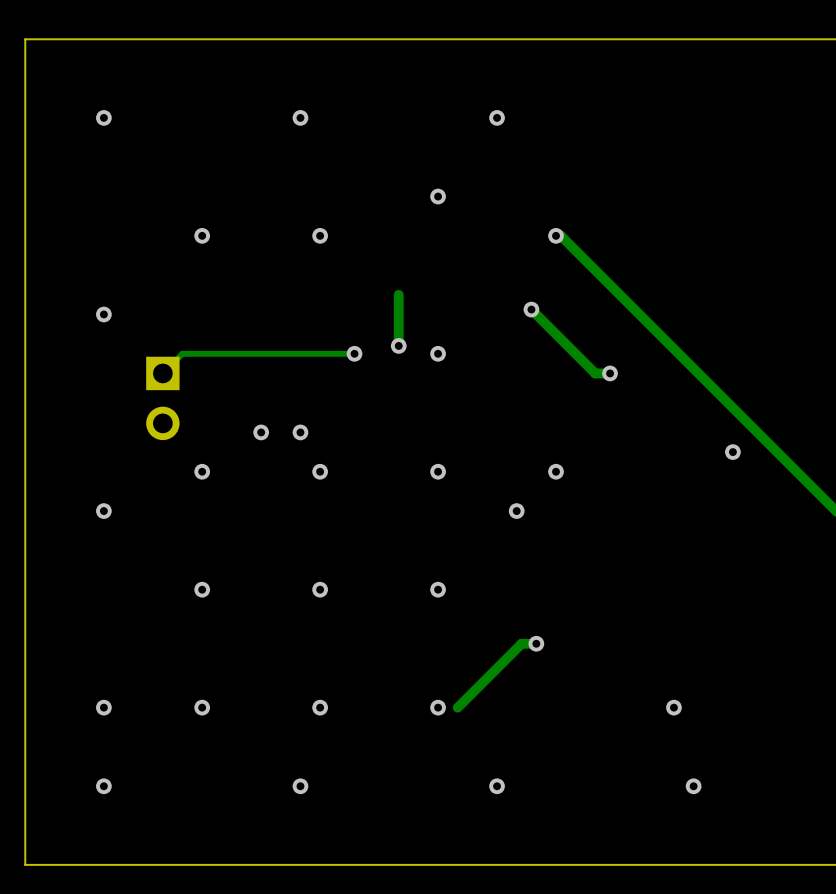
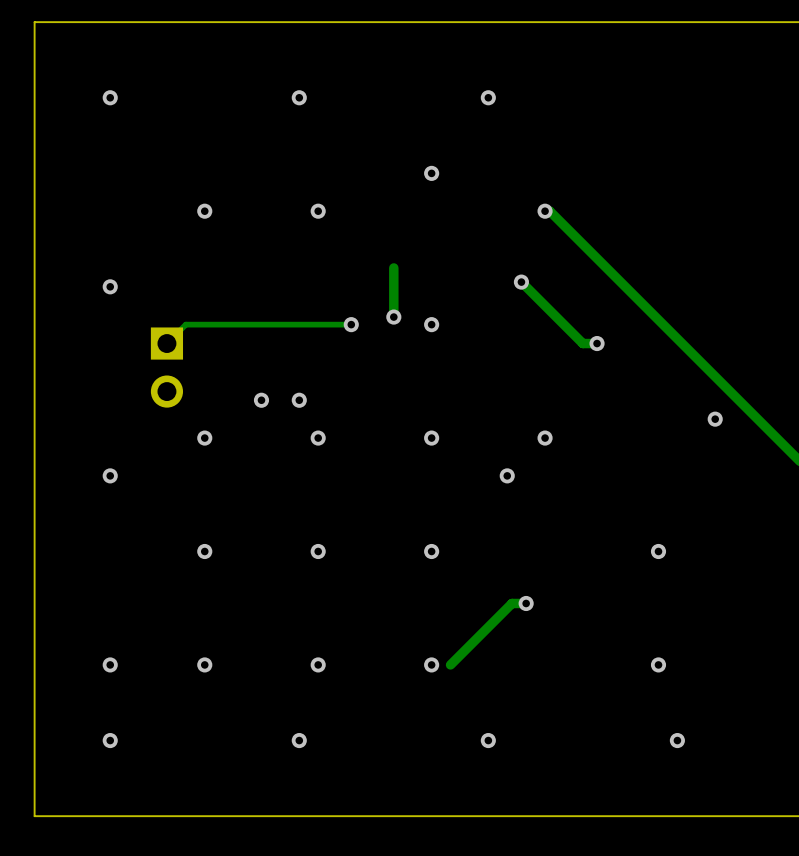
via: none -> (658, 551)

